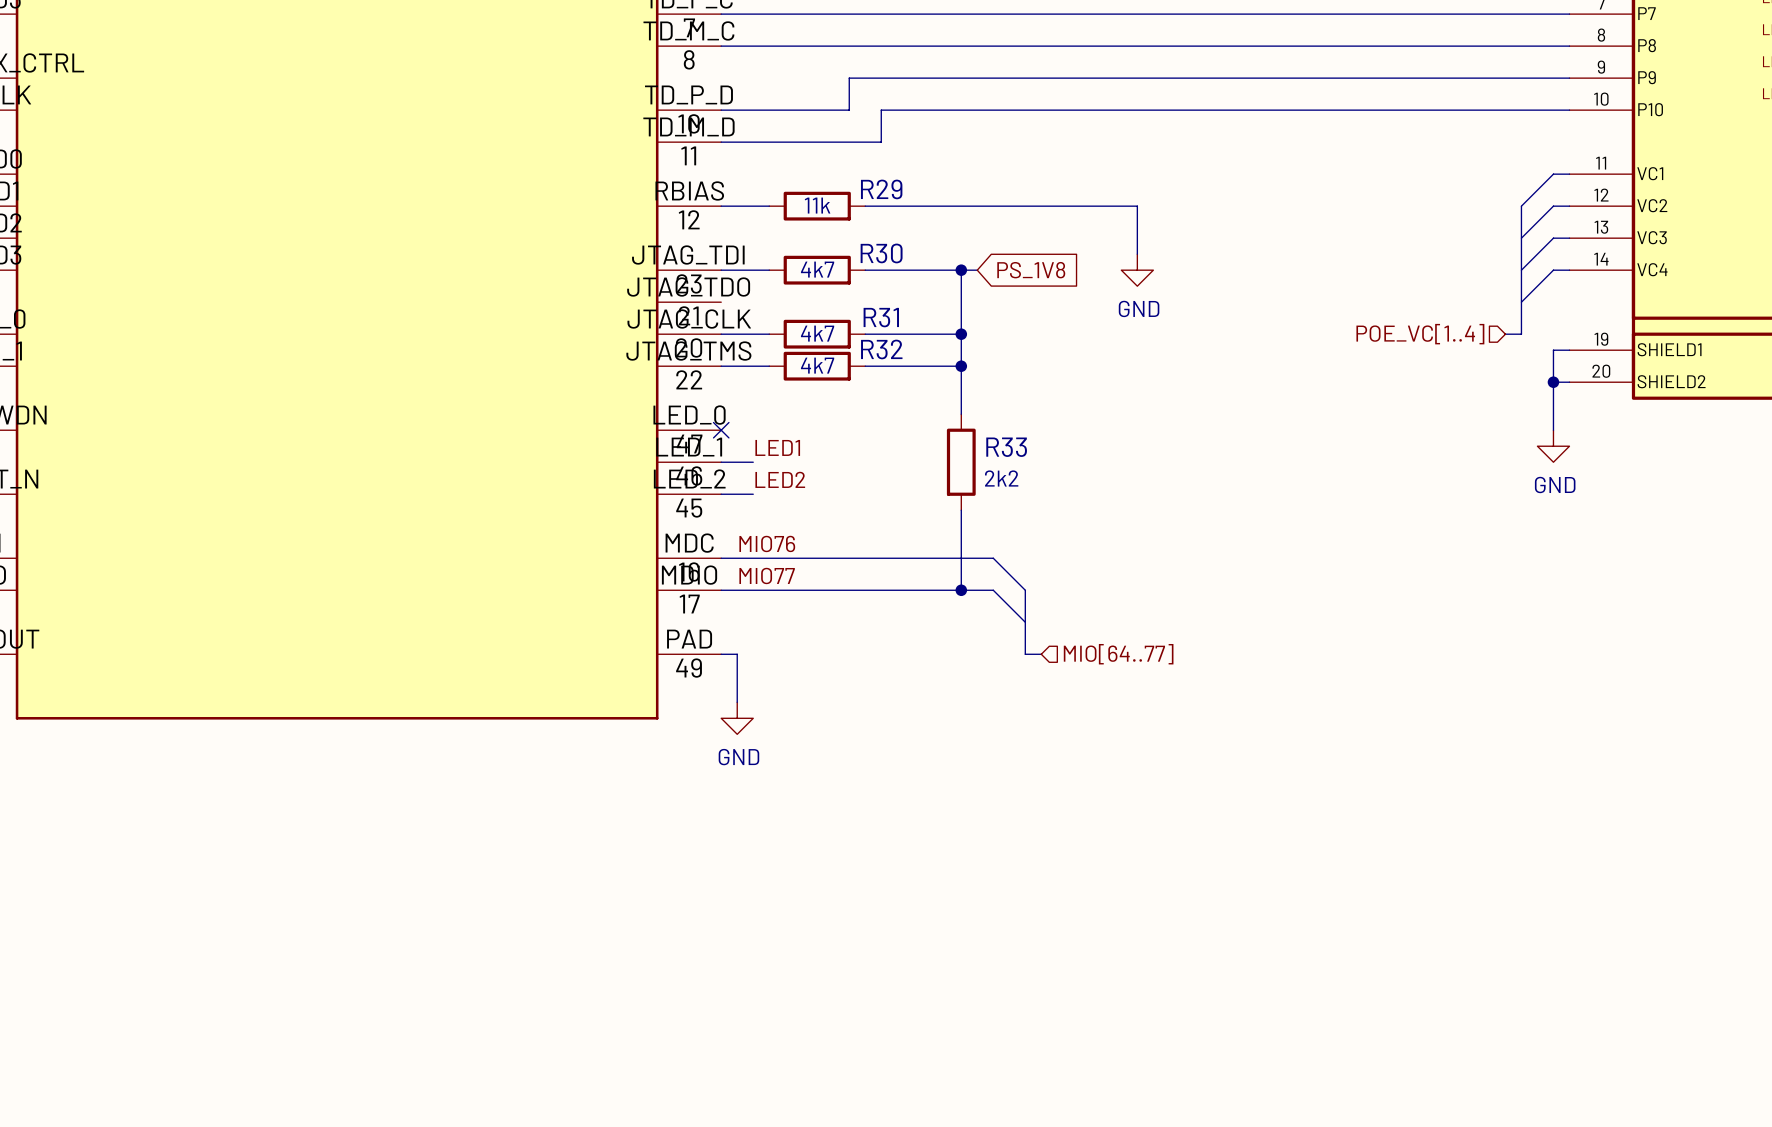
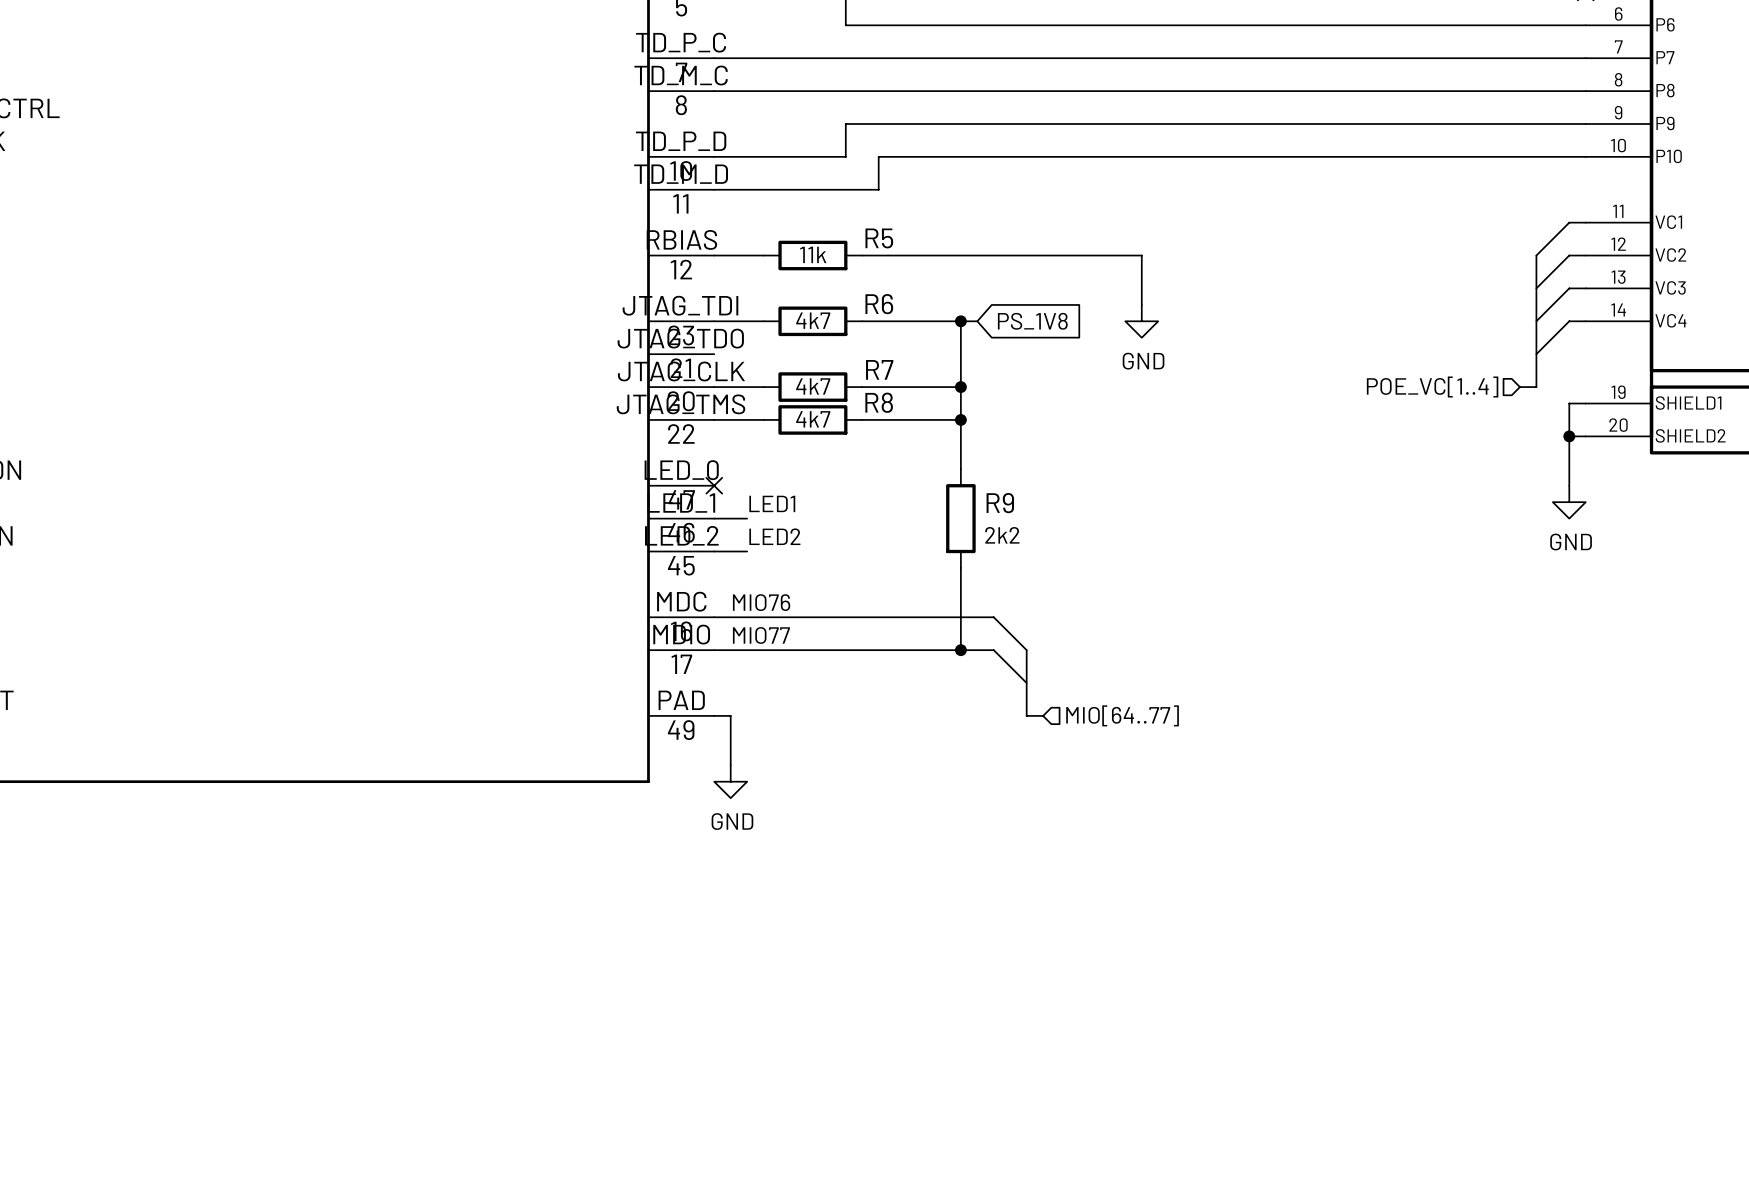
R29 name: R29 (881, 189) -> R5 (879, 238)
R30 name: R30 (881, 253) -> R6 (879, 304)
R31 name: R31 (881, 317) -> R7 (879, 369)
R32 name: R32 (881, 349) -> R8 (879, 402)
R33 name: R33 (1006, 447) -> R9 (1000, 503)

